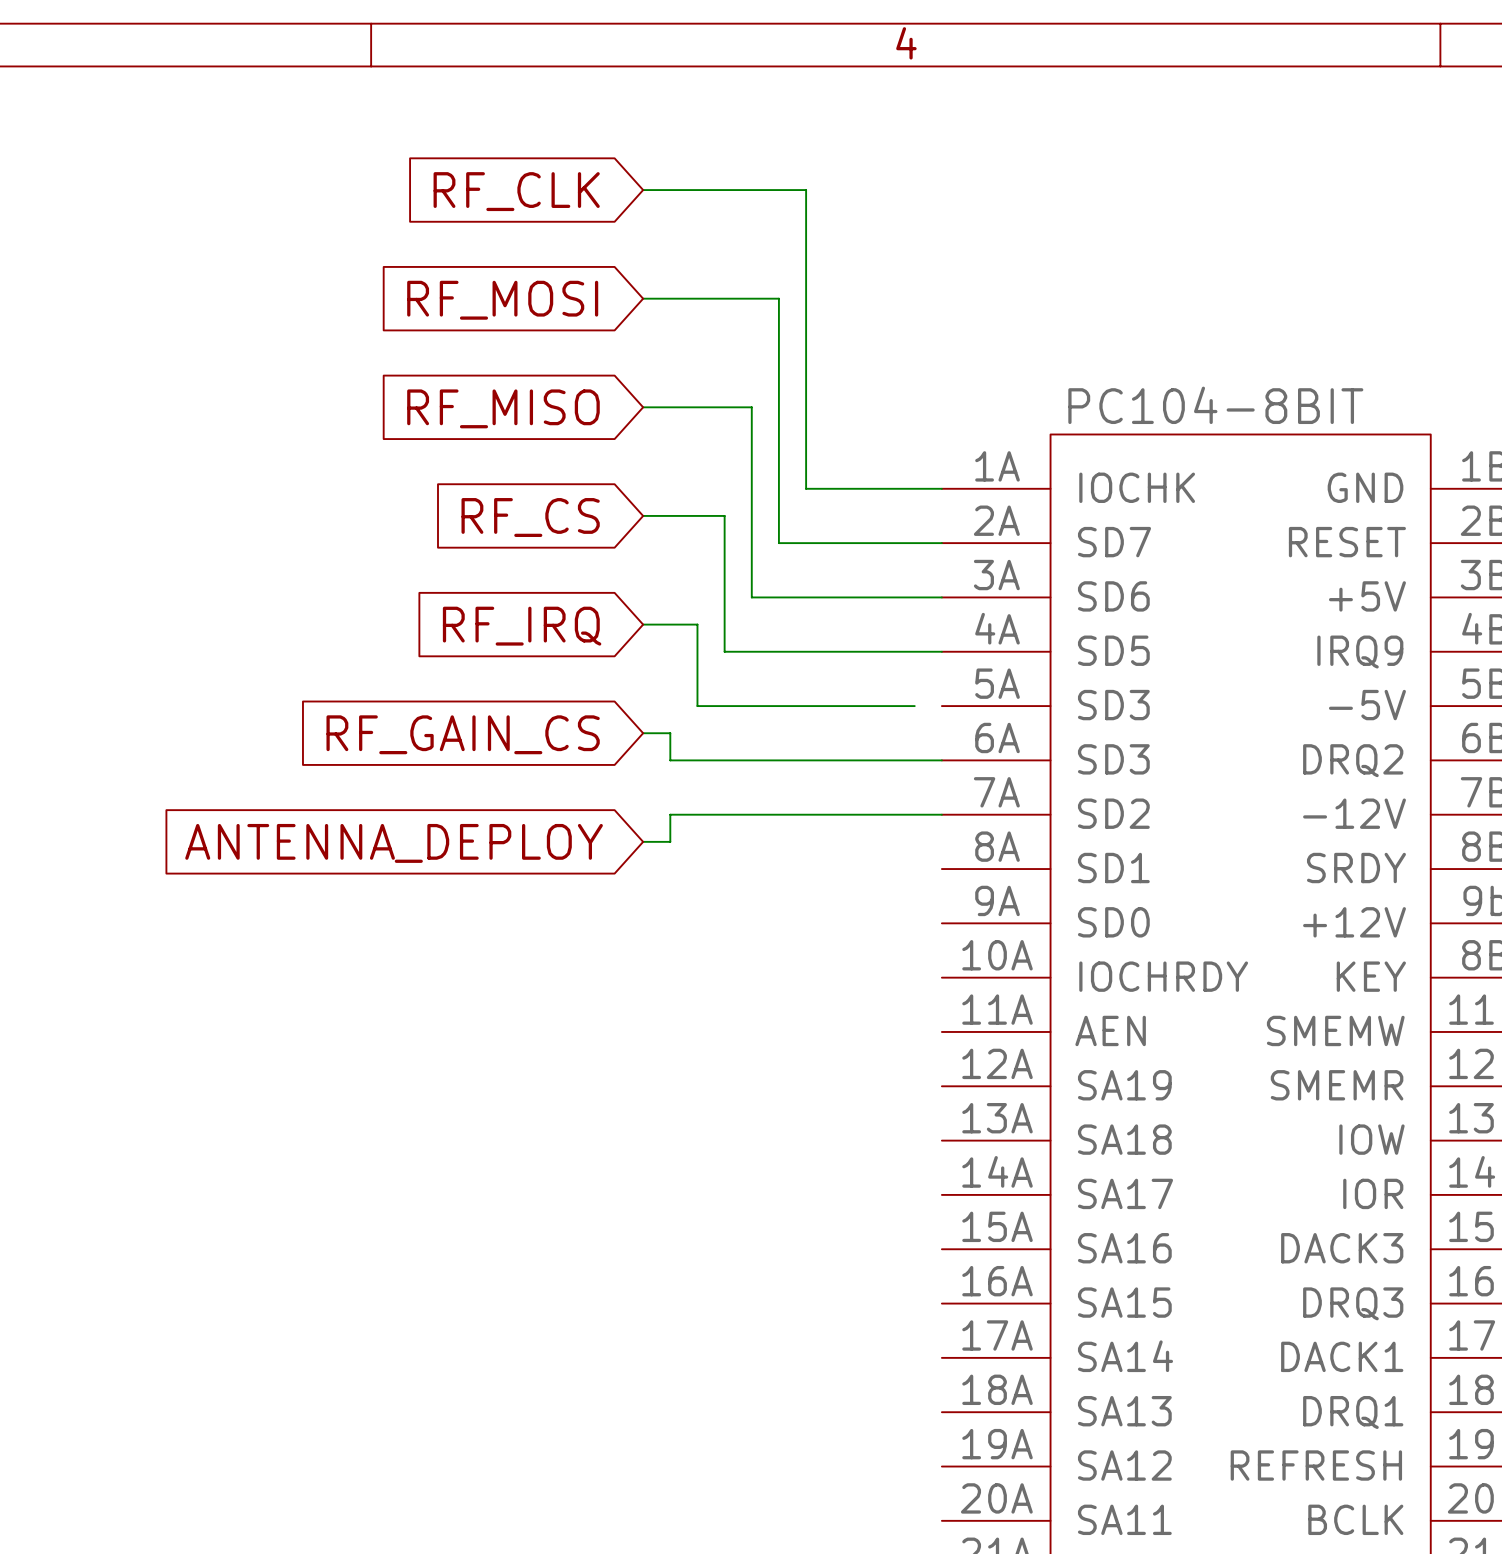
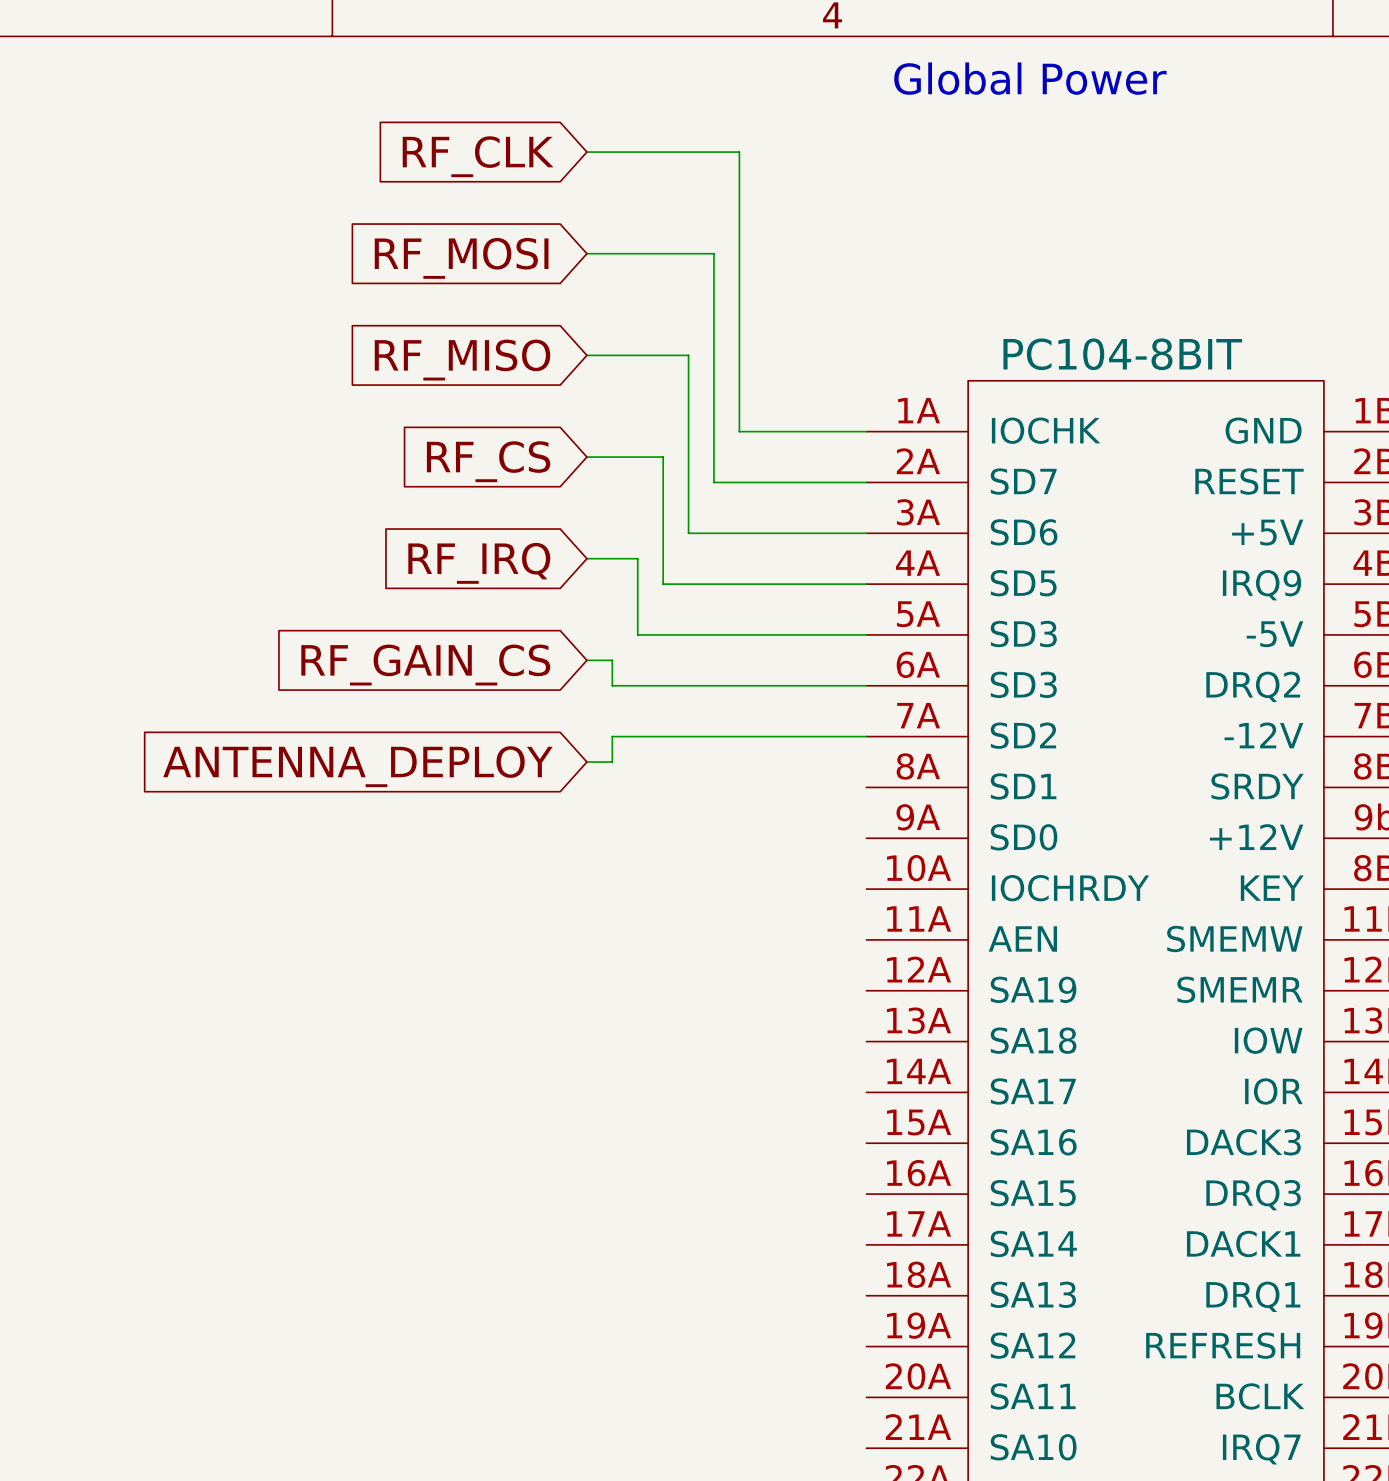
text: none -> Global Power (1030, 78)
wire: none -> (841, 634) (866, 634)

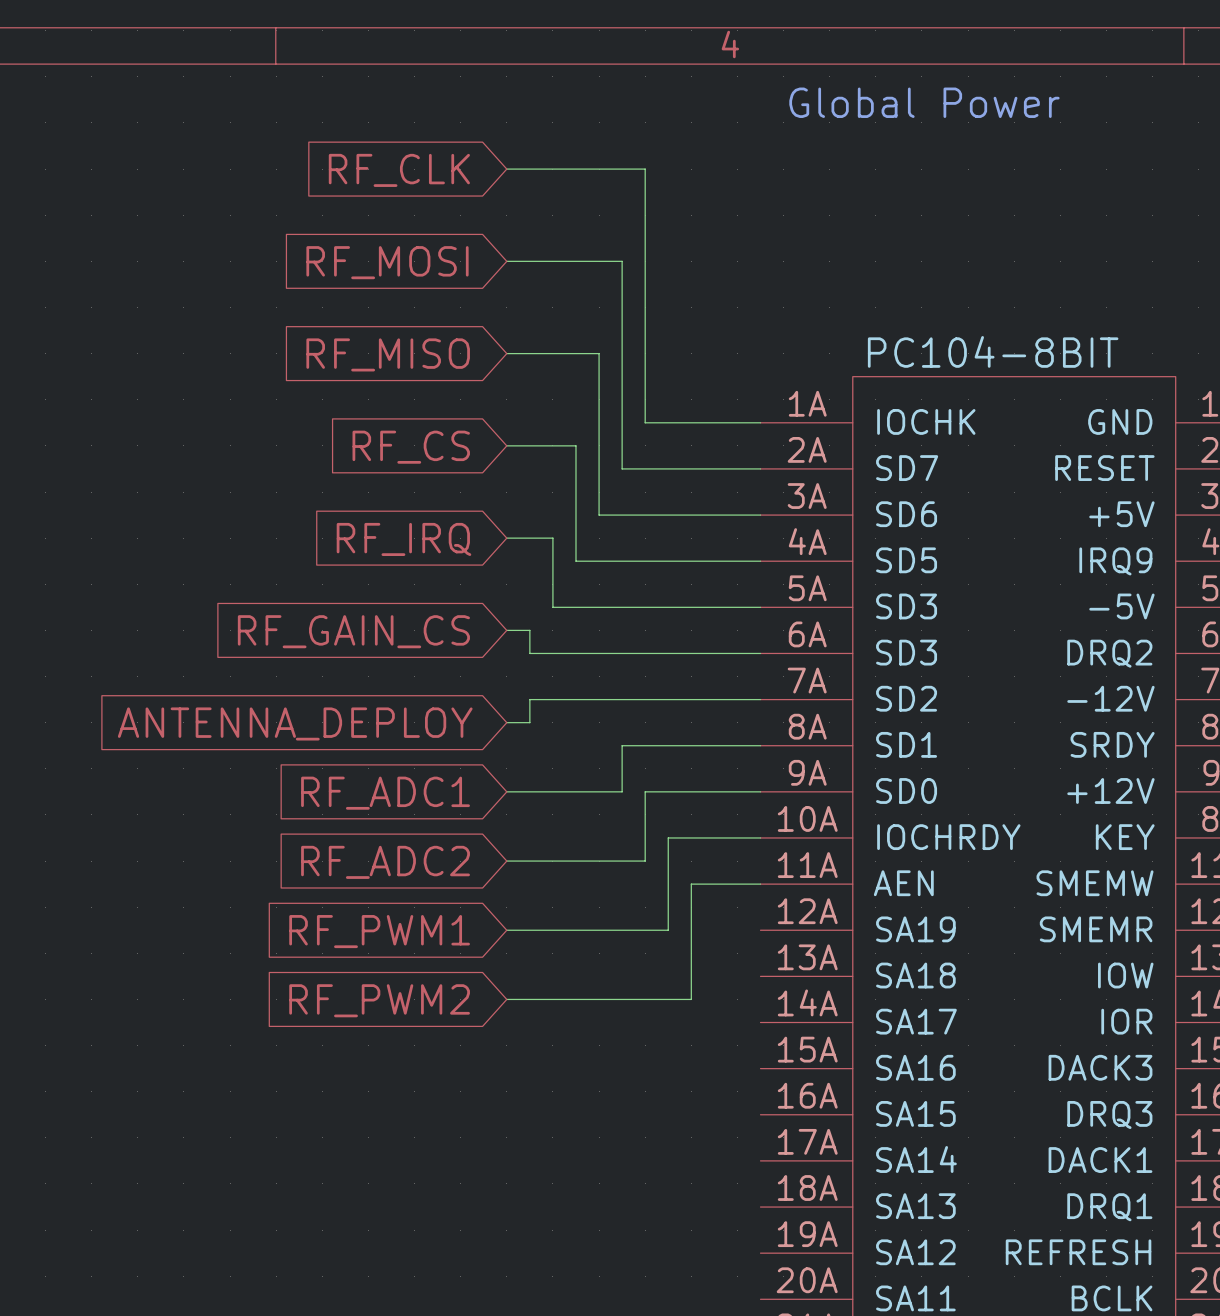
wire: none -> (760, 745) (622, 745) (622, 791) (506, 791)
wire: none -> (760, 791) (645, 791) (645, 861) (506, 861)
global label: none -> RF_ADC1 (385, 793)
wire: none -> (760, 837) (668, 837) (668, 930) (506, 930)
global label: none -> RF_ADC2 (385, 862)
wire: none -> (760, 884) (691, 884) (691, 999) (506, 999)
global label: none -> RF_PWM1 (379, 931)
global label: none -> RF_PWM2 (379, 1000)

